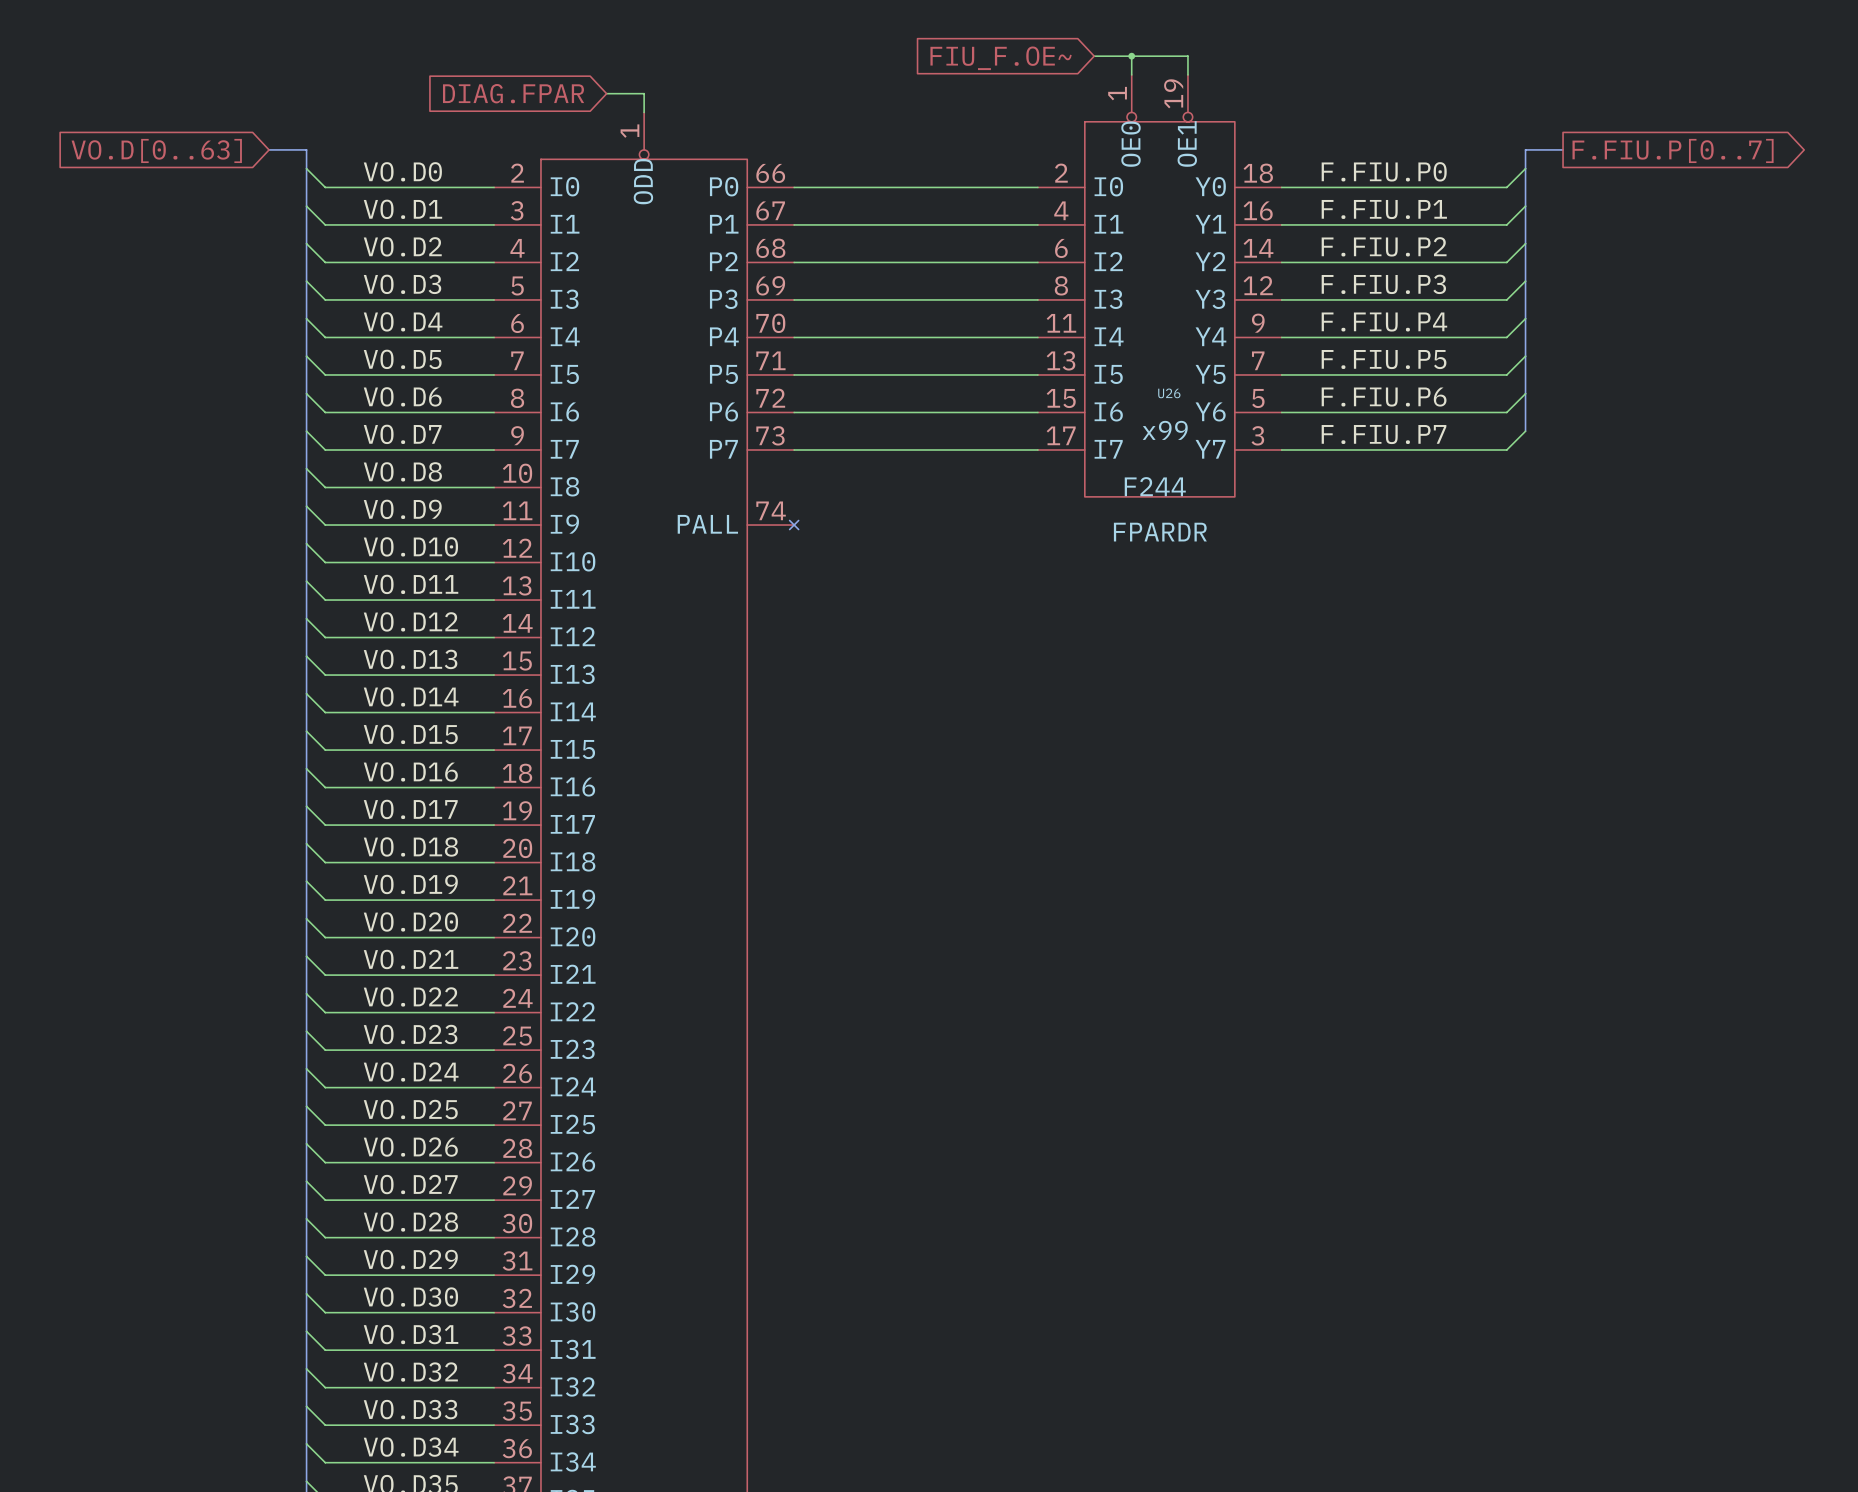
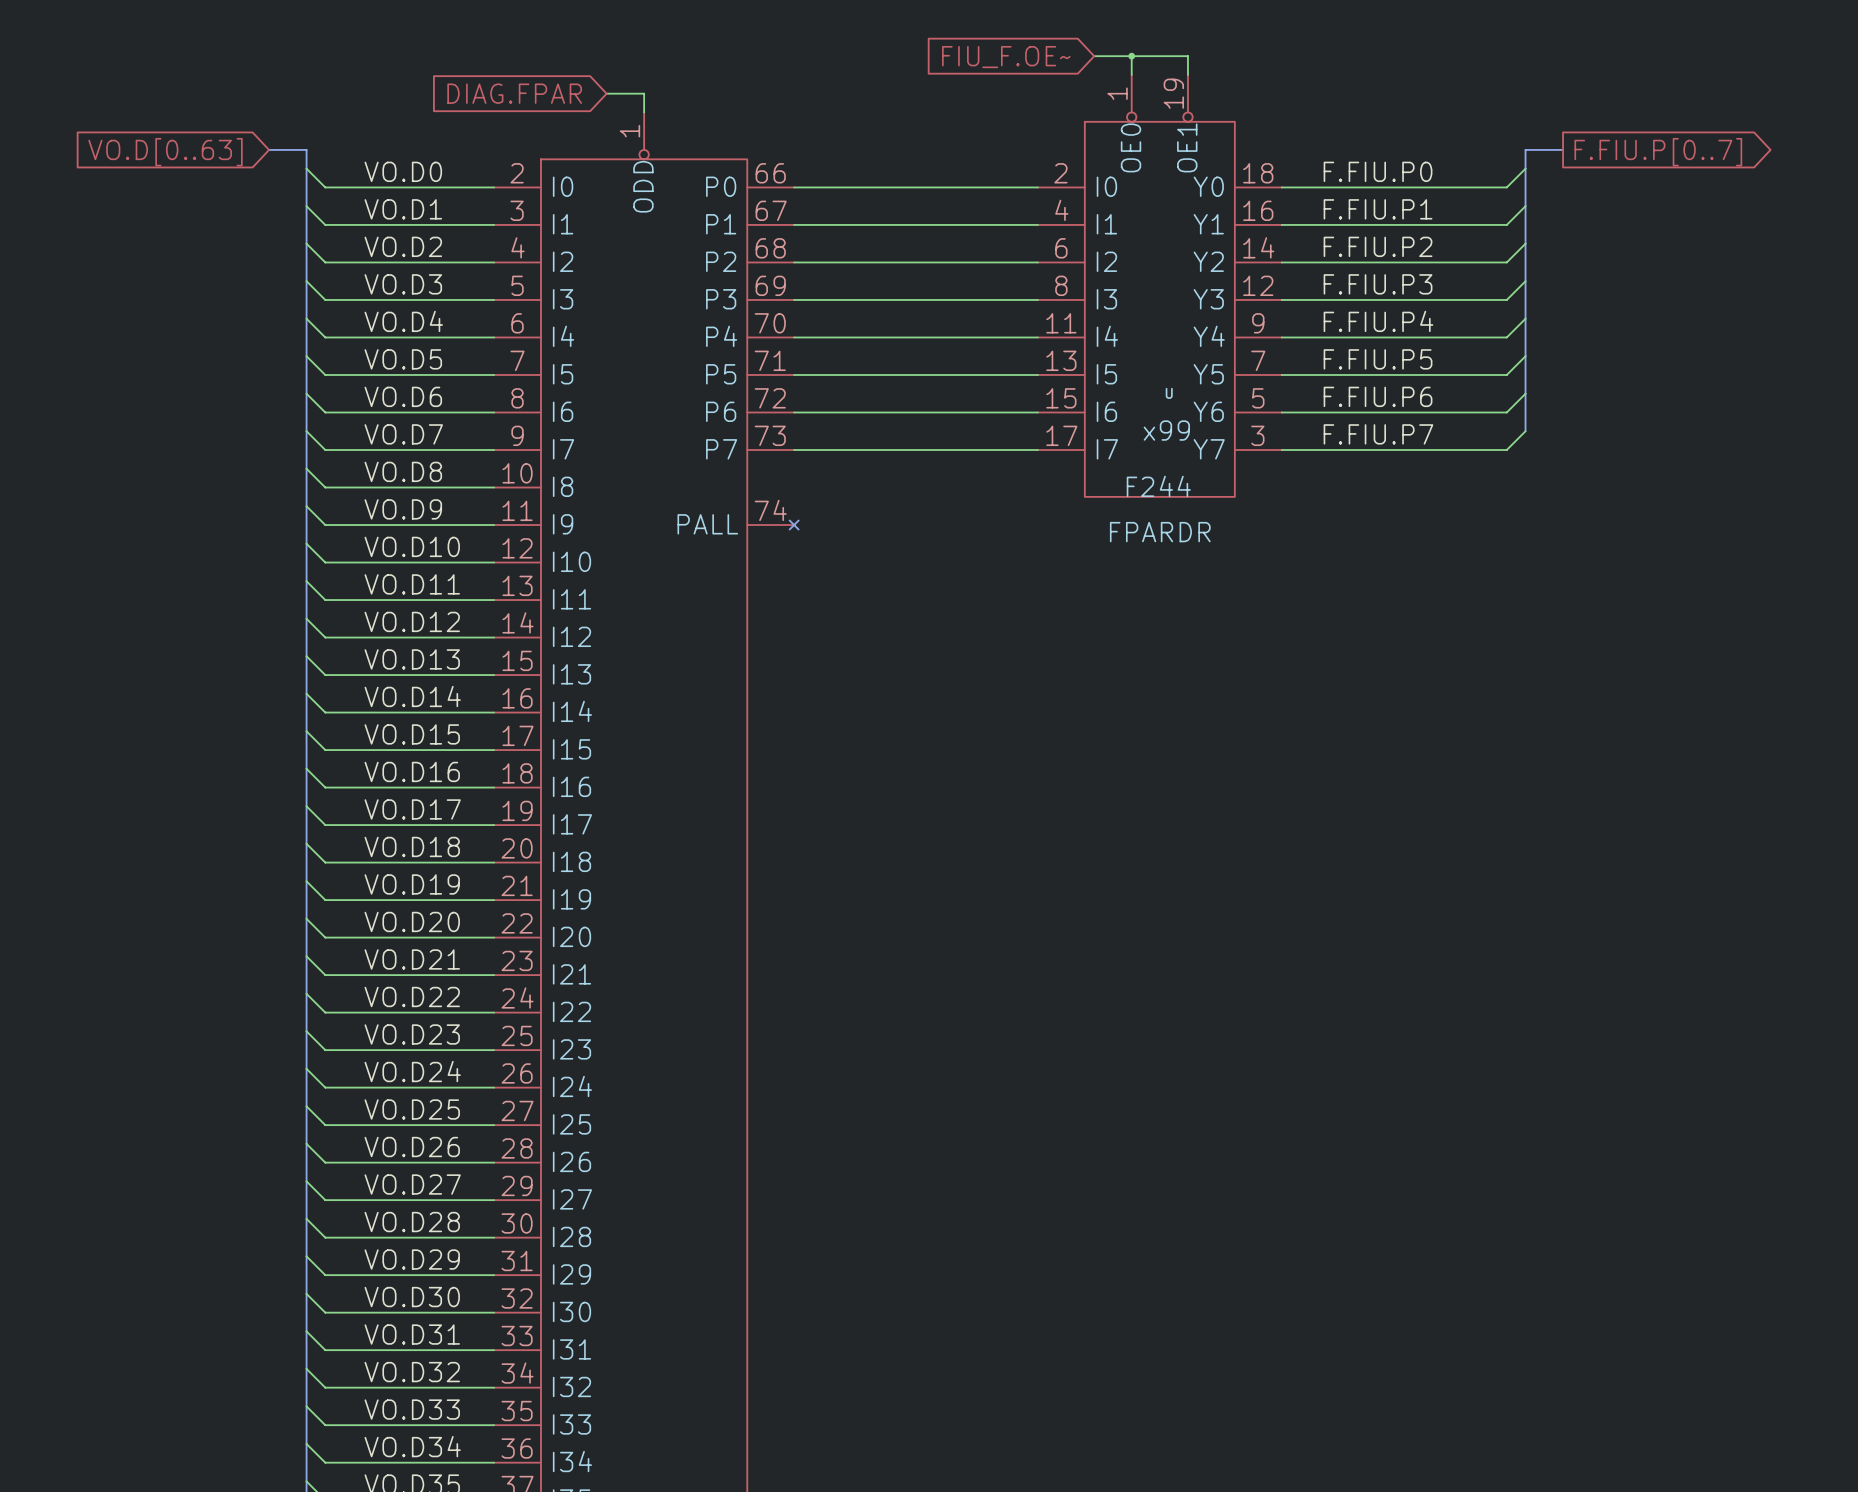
U26 name: U26 (1169, 393) -> U (1169, 393)

